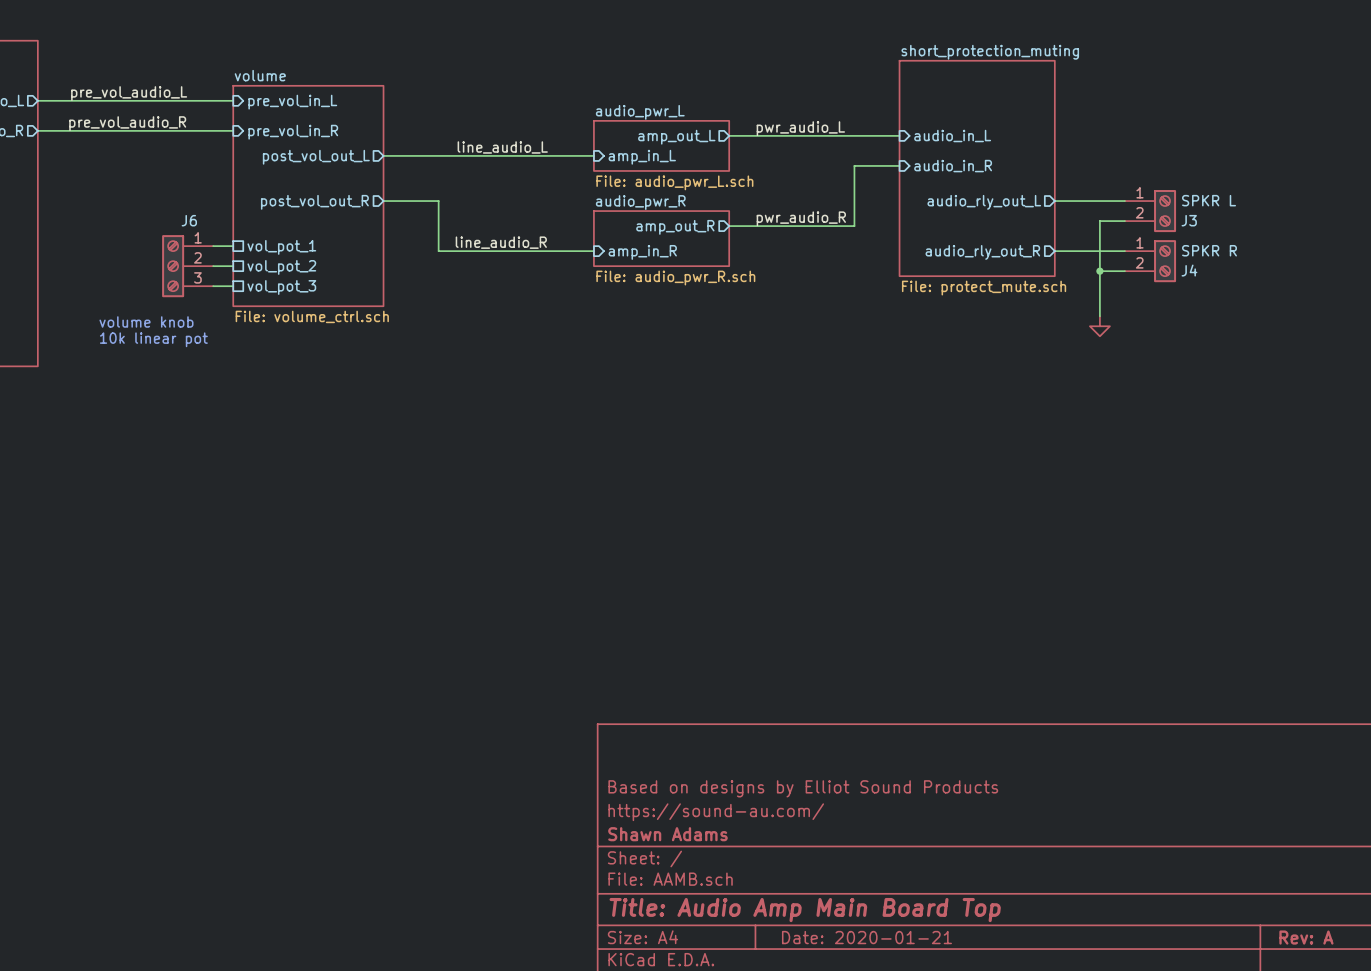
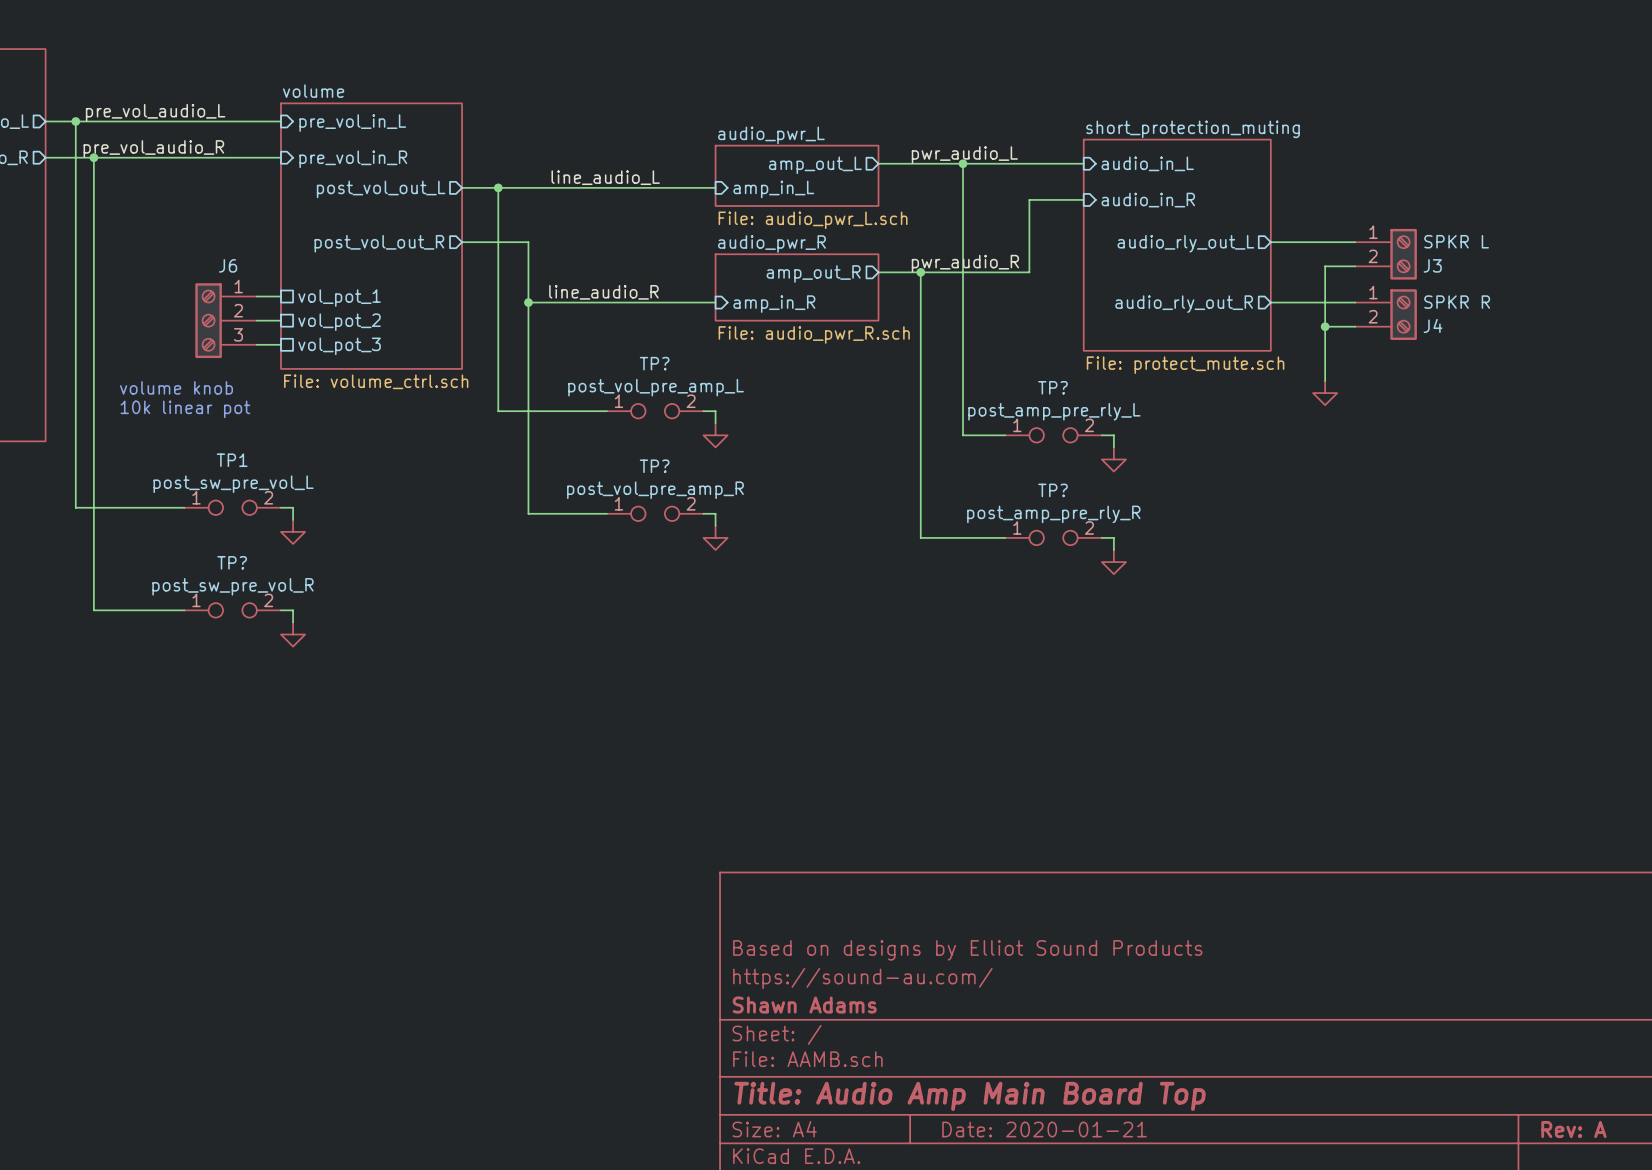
wire: none -> (75, 121) (75, 507) (184, 507)
junction: none -> (75, 121)
wire: none -> (93, 157) (93, 610) (184, 610)
junction: none -> (93, 157)
wire: none -> (963, 163) (963, 435) (1005, 435)
junction: none -> (963, 163)
wire: none -> (498, 187) (498, 411) (606, 411)
junction: none -> (498, 187)
sheet short_protection_muting: File: protect_mute.sch (977, 168) -> none
sheet short_protection_muting: none -> File: protect_mute.sch (1177, 245)
wire: none -> (920, 272) (920, 537) (1005, 537)
junction: none -> (920, 272)
wire: none -> (528, 302) (528, 513) (606, 513)
junction: none -> (528, 302)
TP?: none -> post_vol_pre_amp_L (655, 411)
wire: none -> (703, 411) (715, 411) (715, 423)
power symbol: none -> (715, 435)
TP?: none -> post_amp_pre_rly_L (1053, 435)
wire: none -> (1101, 435) (1113, 435) (1113, 447)
power symbol: none -> (1113, 459)
TP1: none -> post_sw_pre_vol_L (232, 507)
wire: none -> (280, 507) (293, 507) (293, 519)
TP?: none -> post_vol_pre_amp_R (655, 513)
wire: none -> (703, 513) (715, 513) (715, 525)
power symbol: none -> (293, 531)
power symbol: none -> (715, 537)
TP?: none -> post_amp_pre_rly_R (1053, 537)
wire: none -> (1101, 537) (1113, 537) (1113, 550)
power symbol: none -> (1113, 562)
TP?: none -> post_sw_pre_vol_R (232, 610)
wire: none -> (280, 610) (293, 610) (293, 622)
power symbol: none -> (293, 634)

